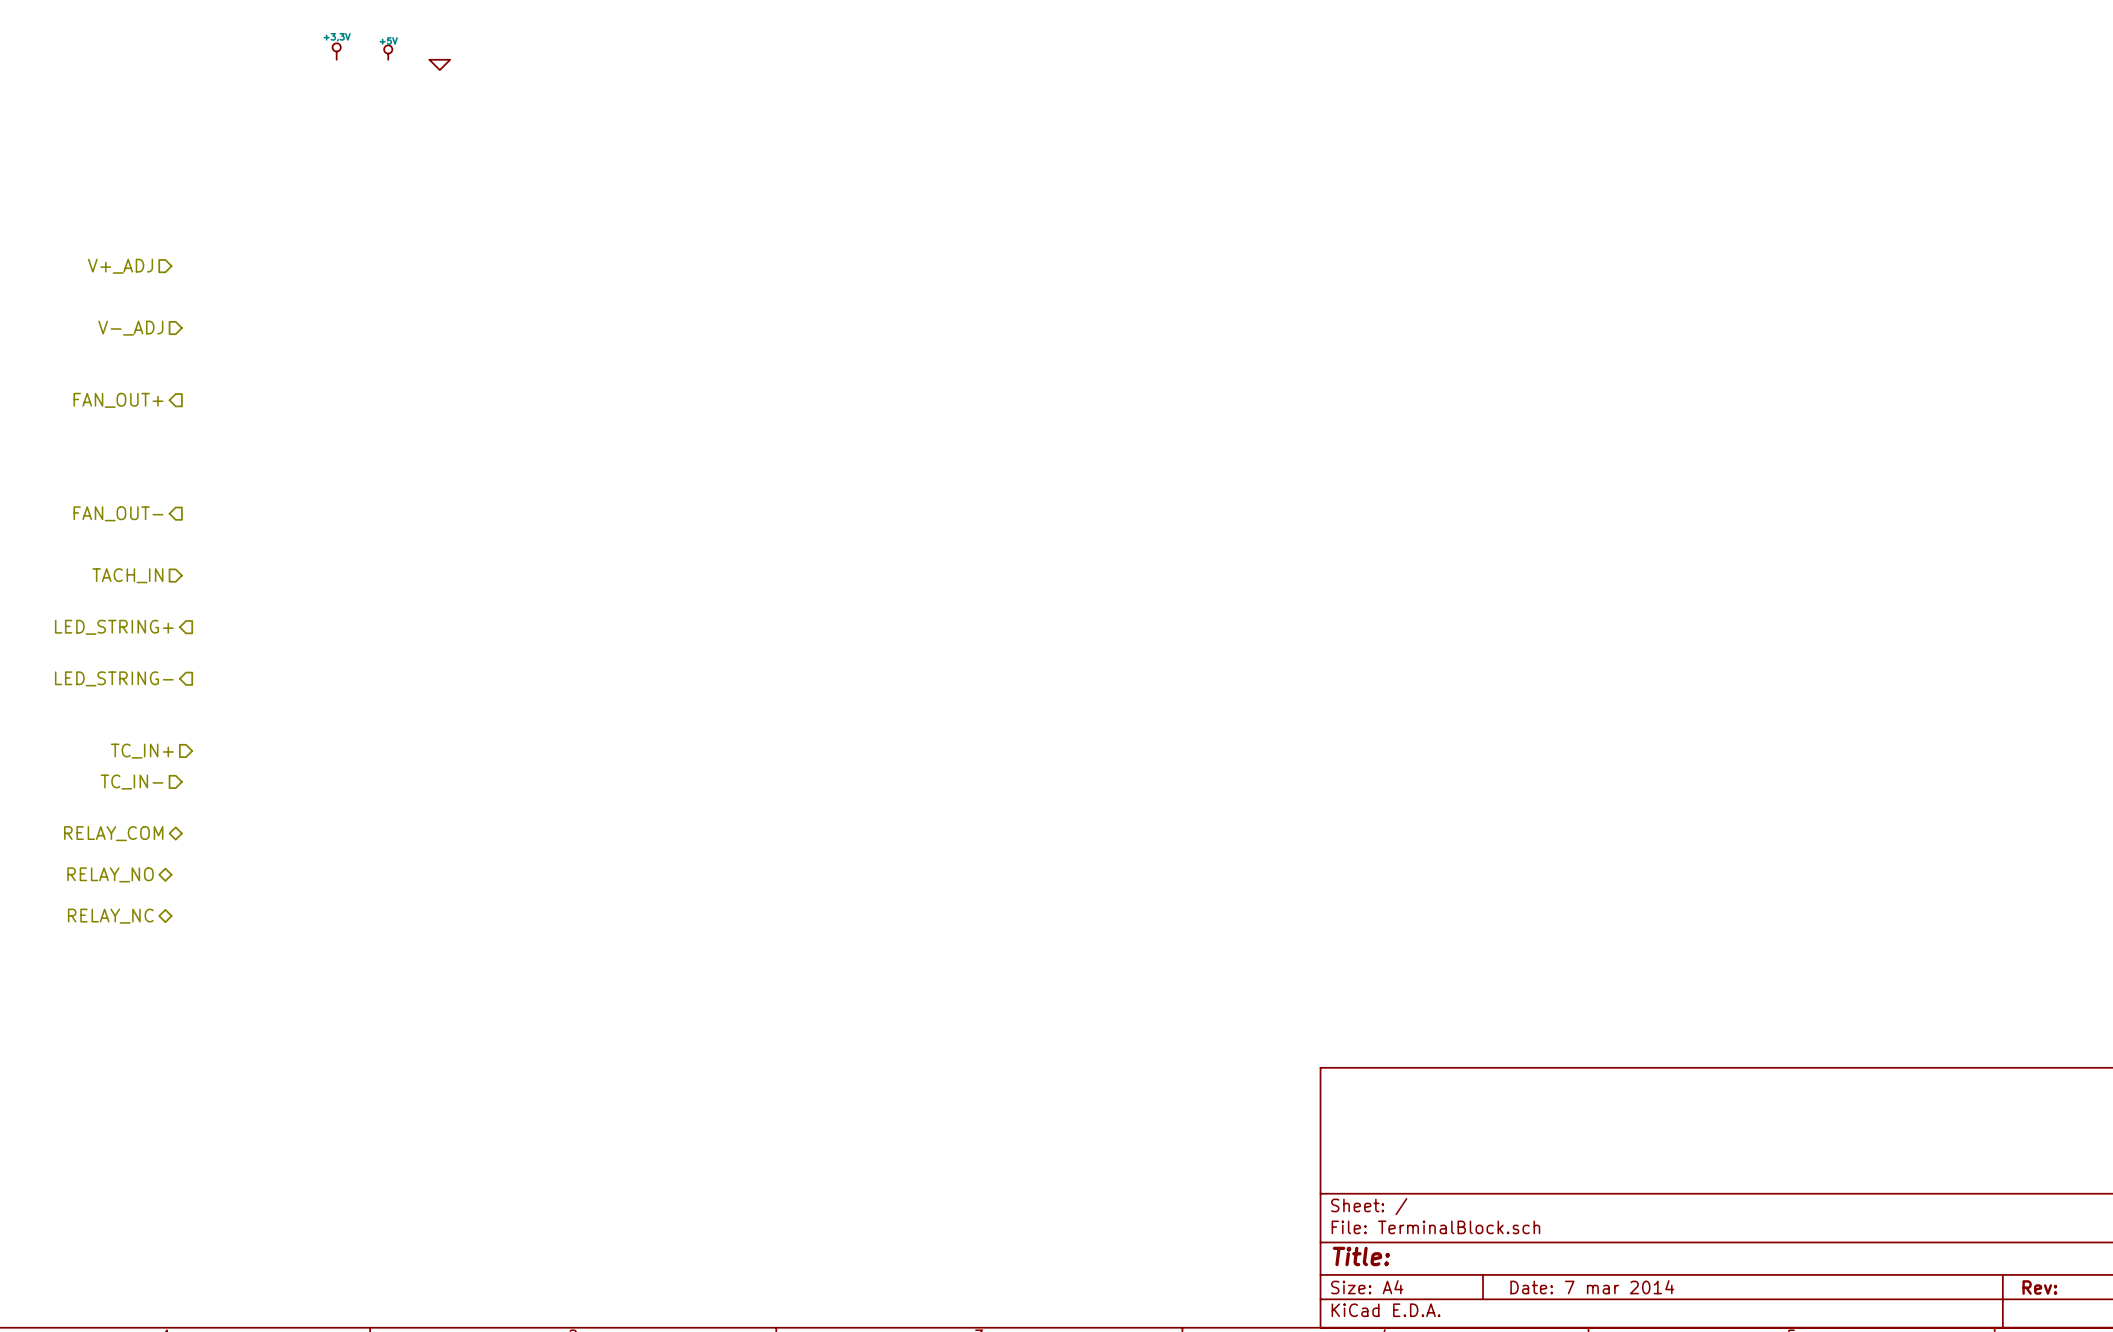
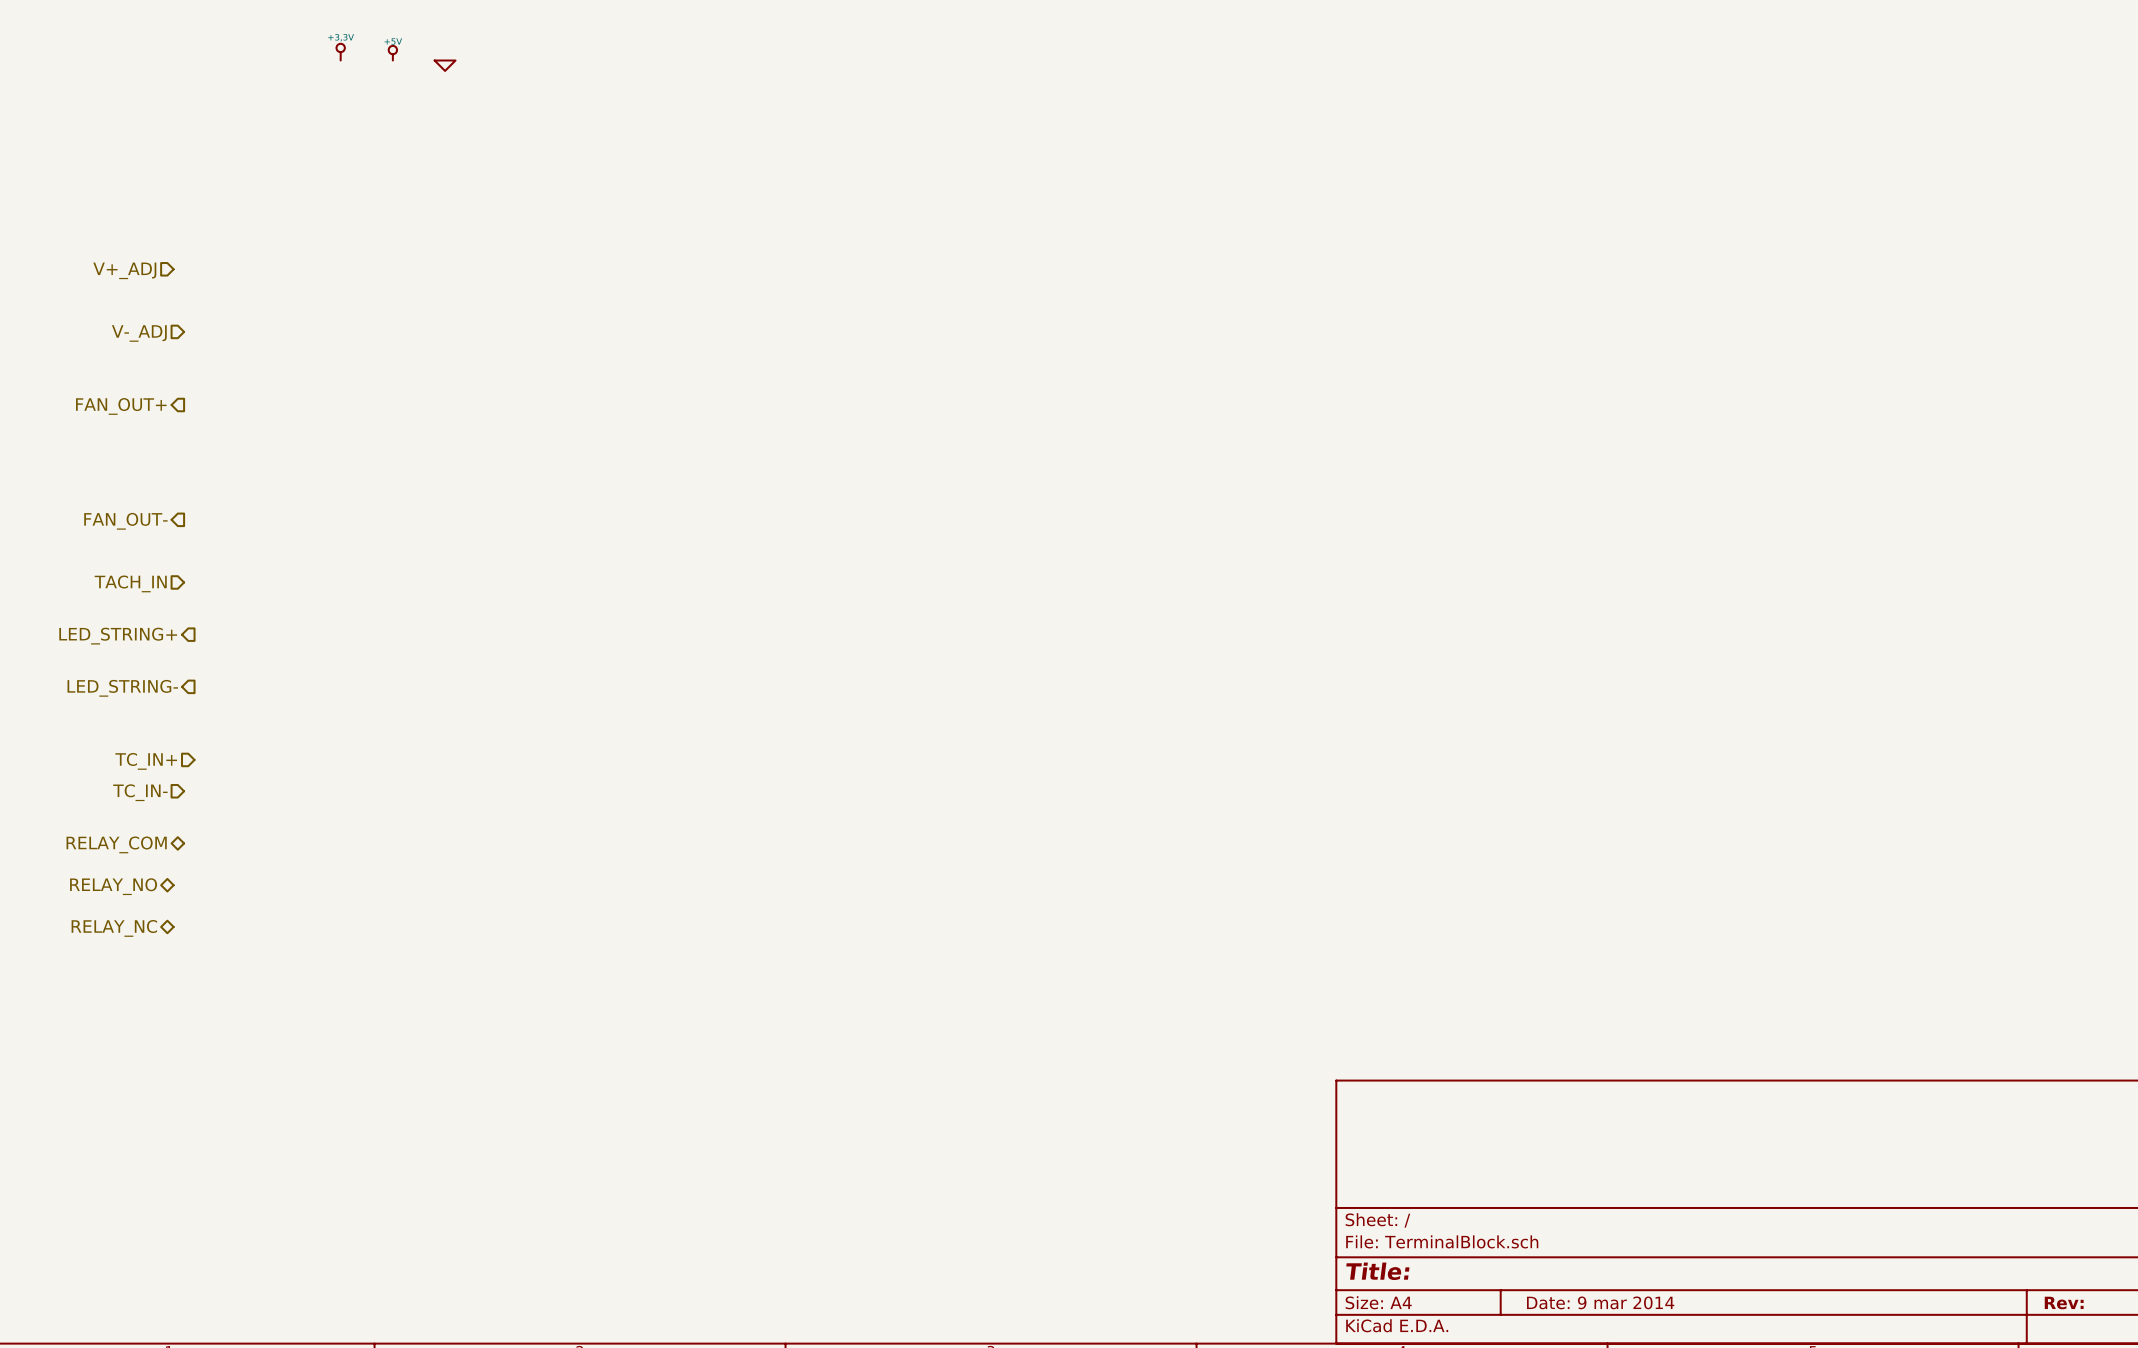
title block: Date: 7 mar 2014 (1592, 1287) -> Date: 9 mar 2014 (1600, 1302)

